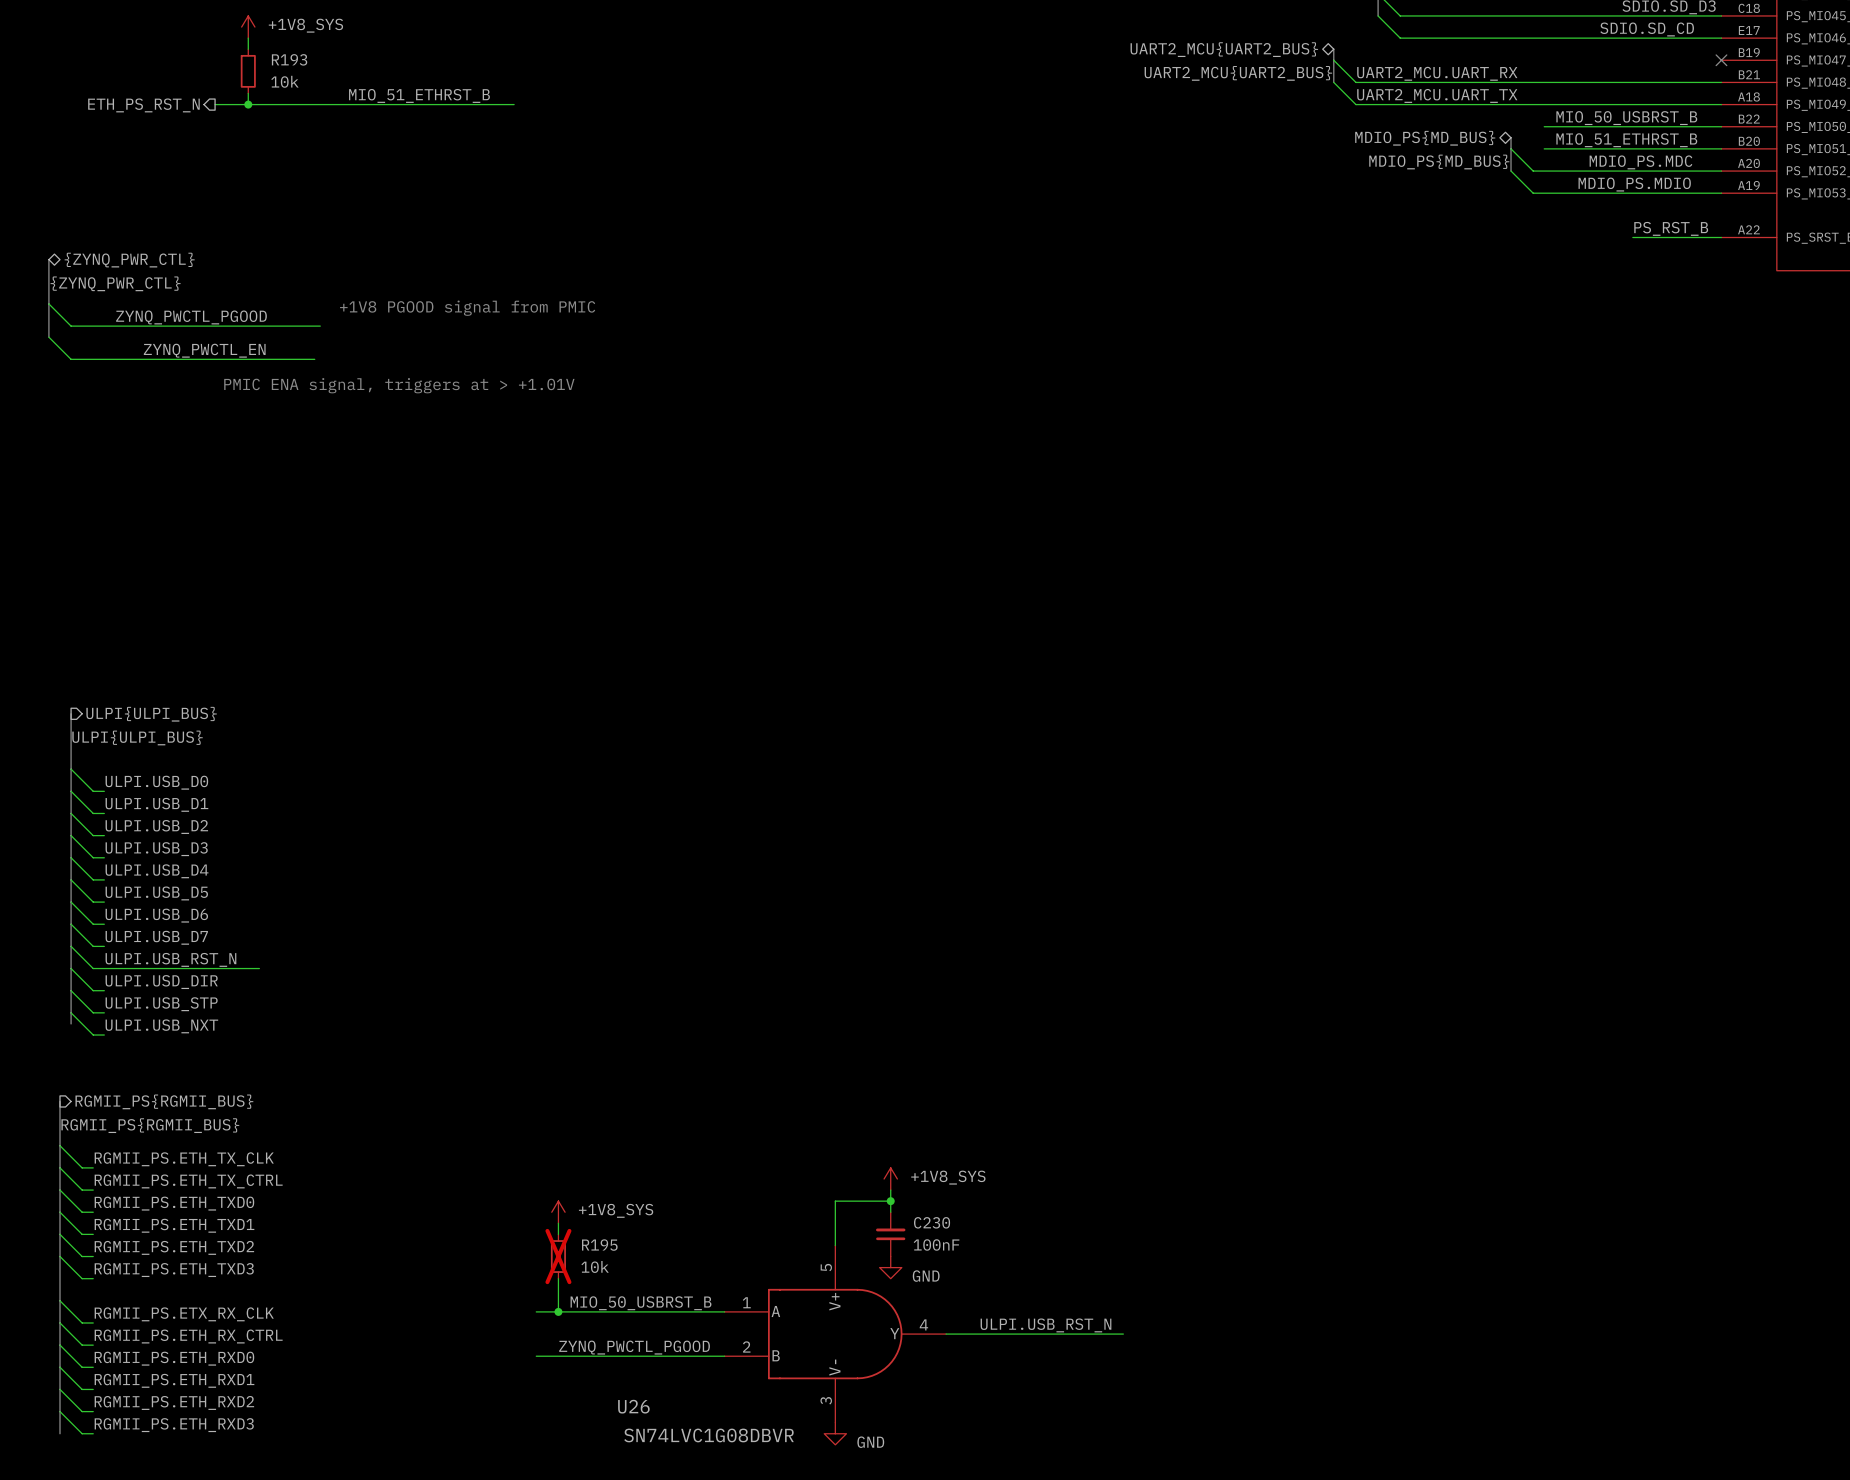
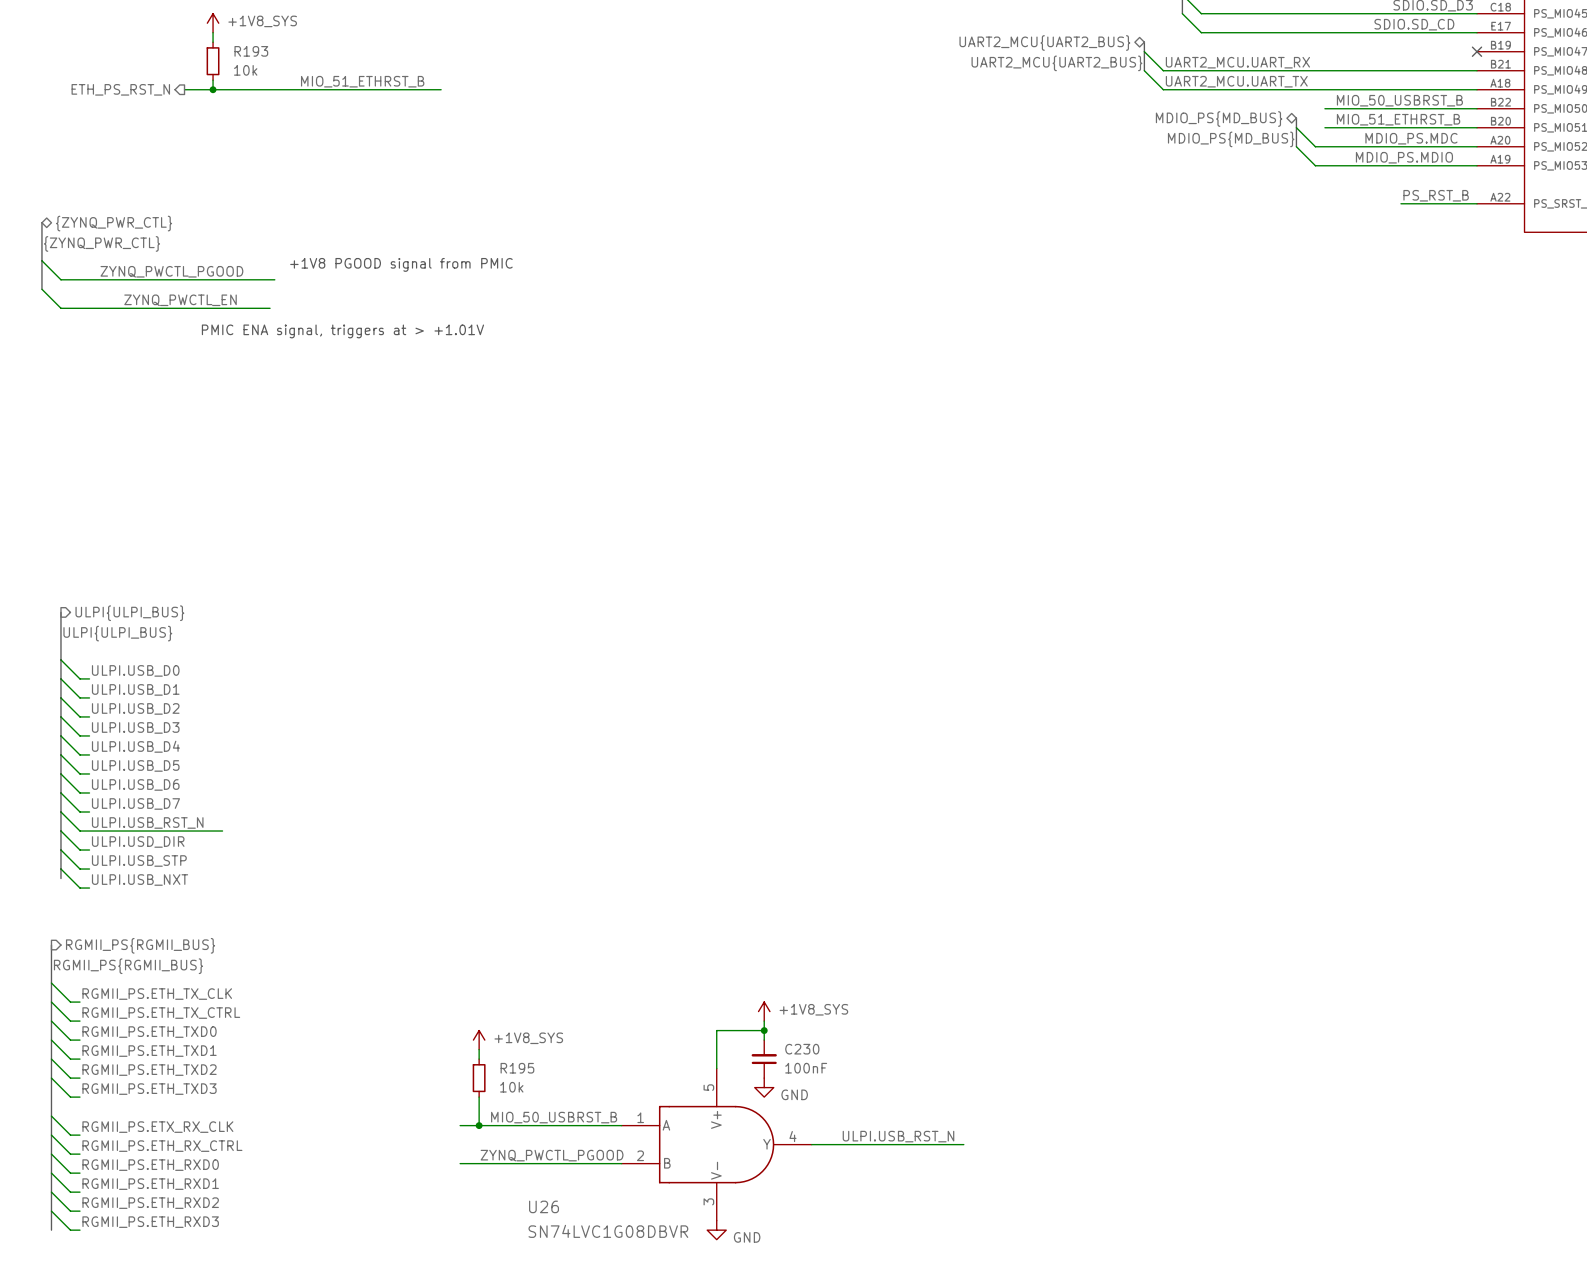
R195 do-not-place cross: (558, 1256) -> none

